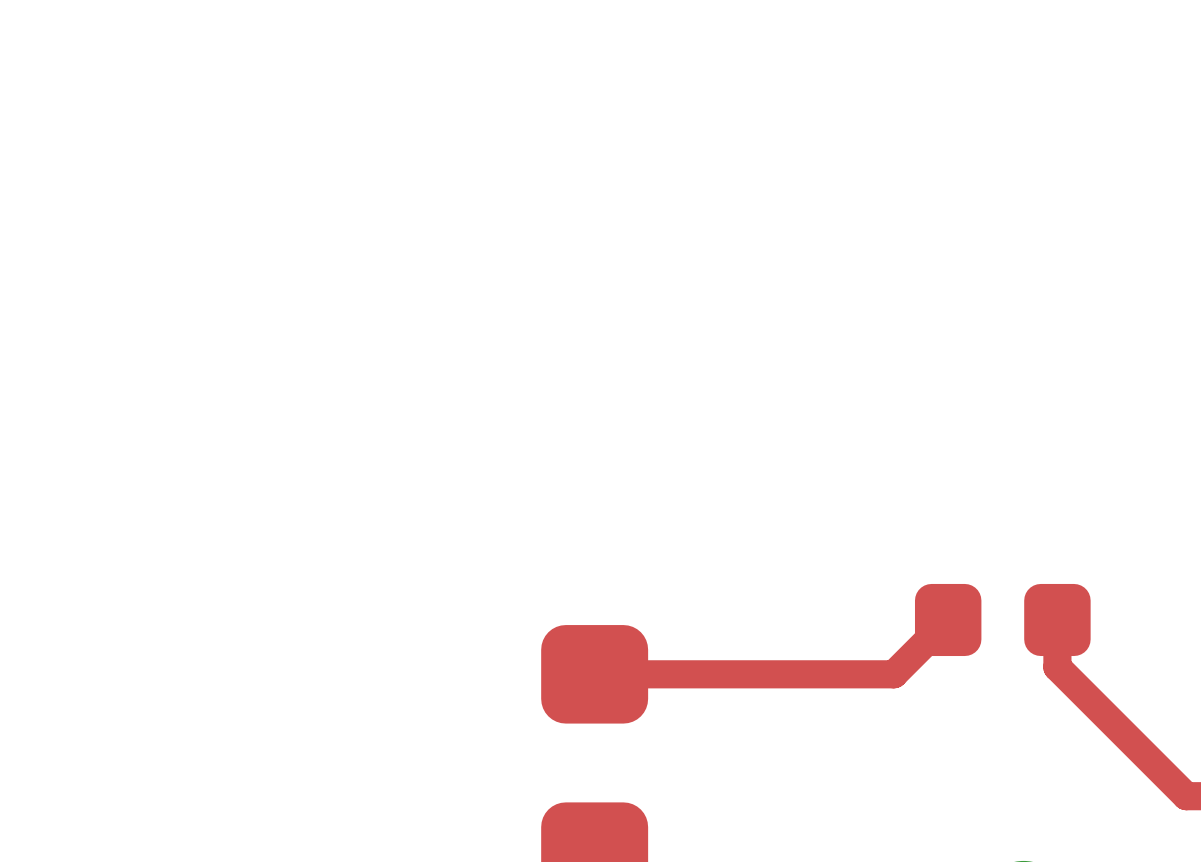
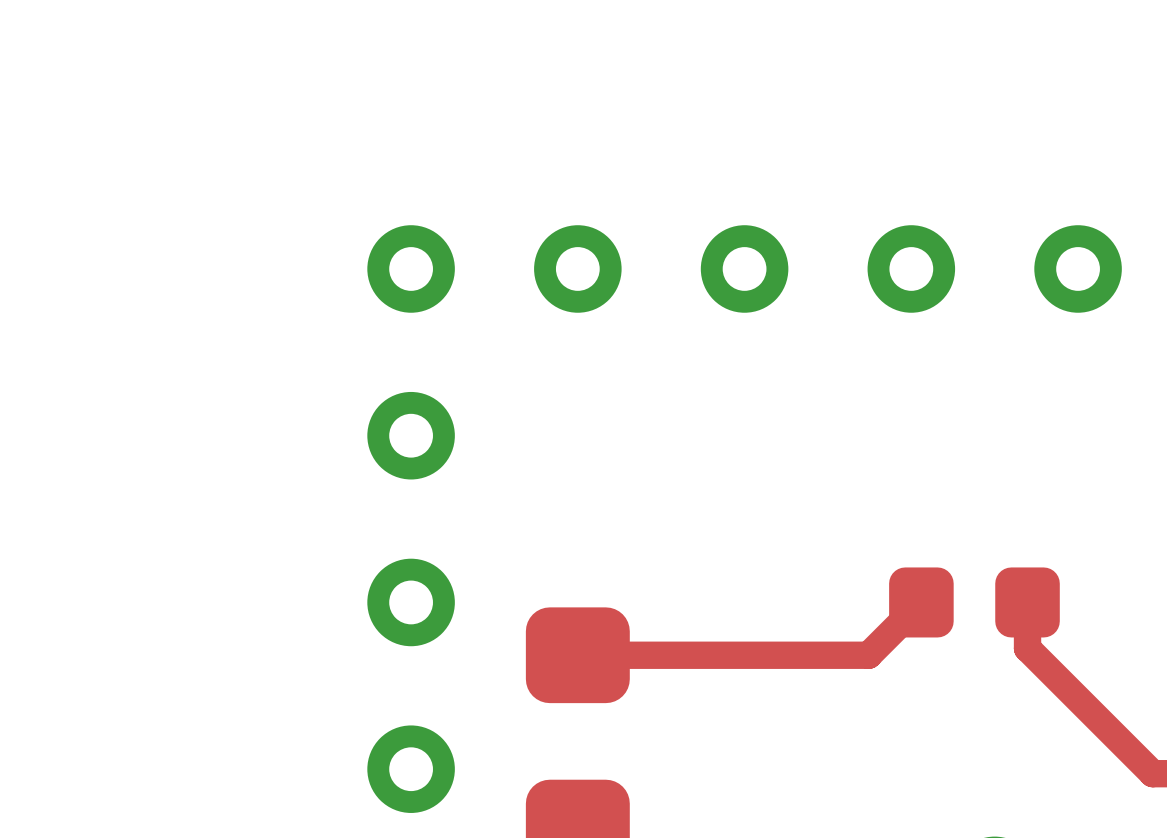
via: none -> (411, 268)
via: none -> (577, 268)
via: none -> (744, 268)
via: none -> (911, 268)
via: none -> (1078, 268)
via: none -> (411, 435)
via: none -> (411, 602)
via: none -> (411, 769)

